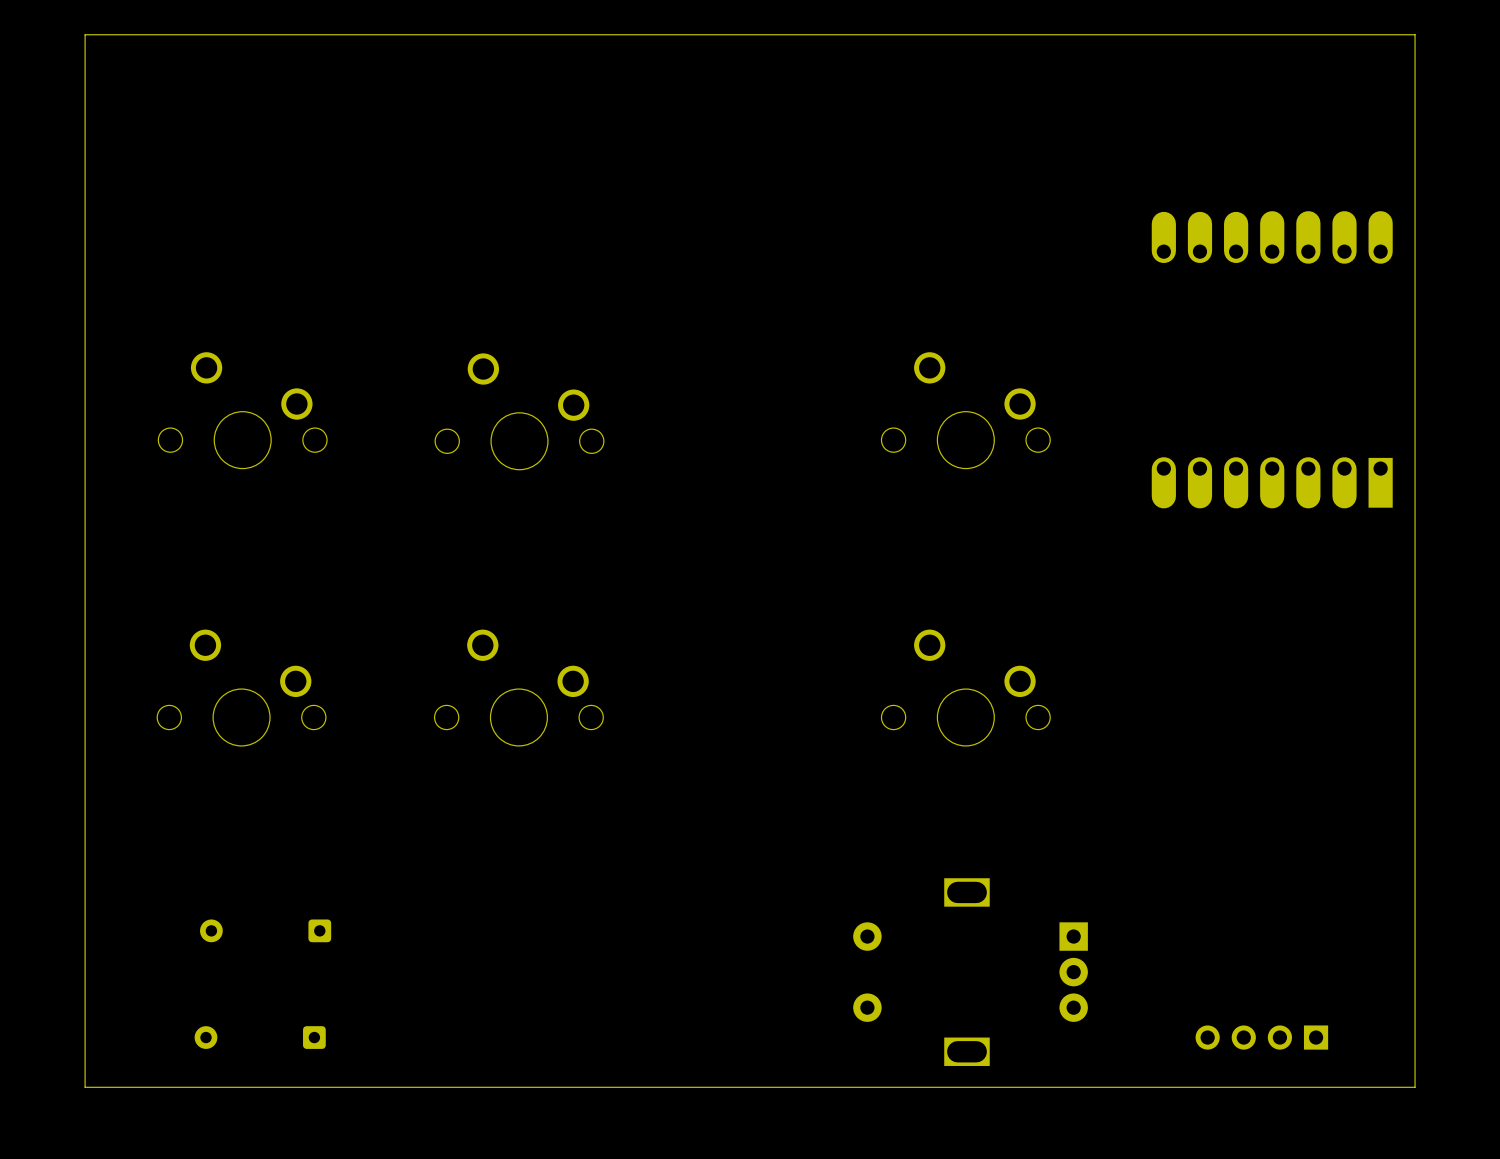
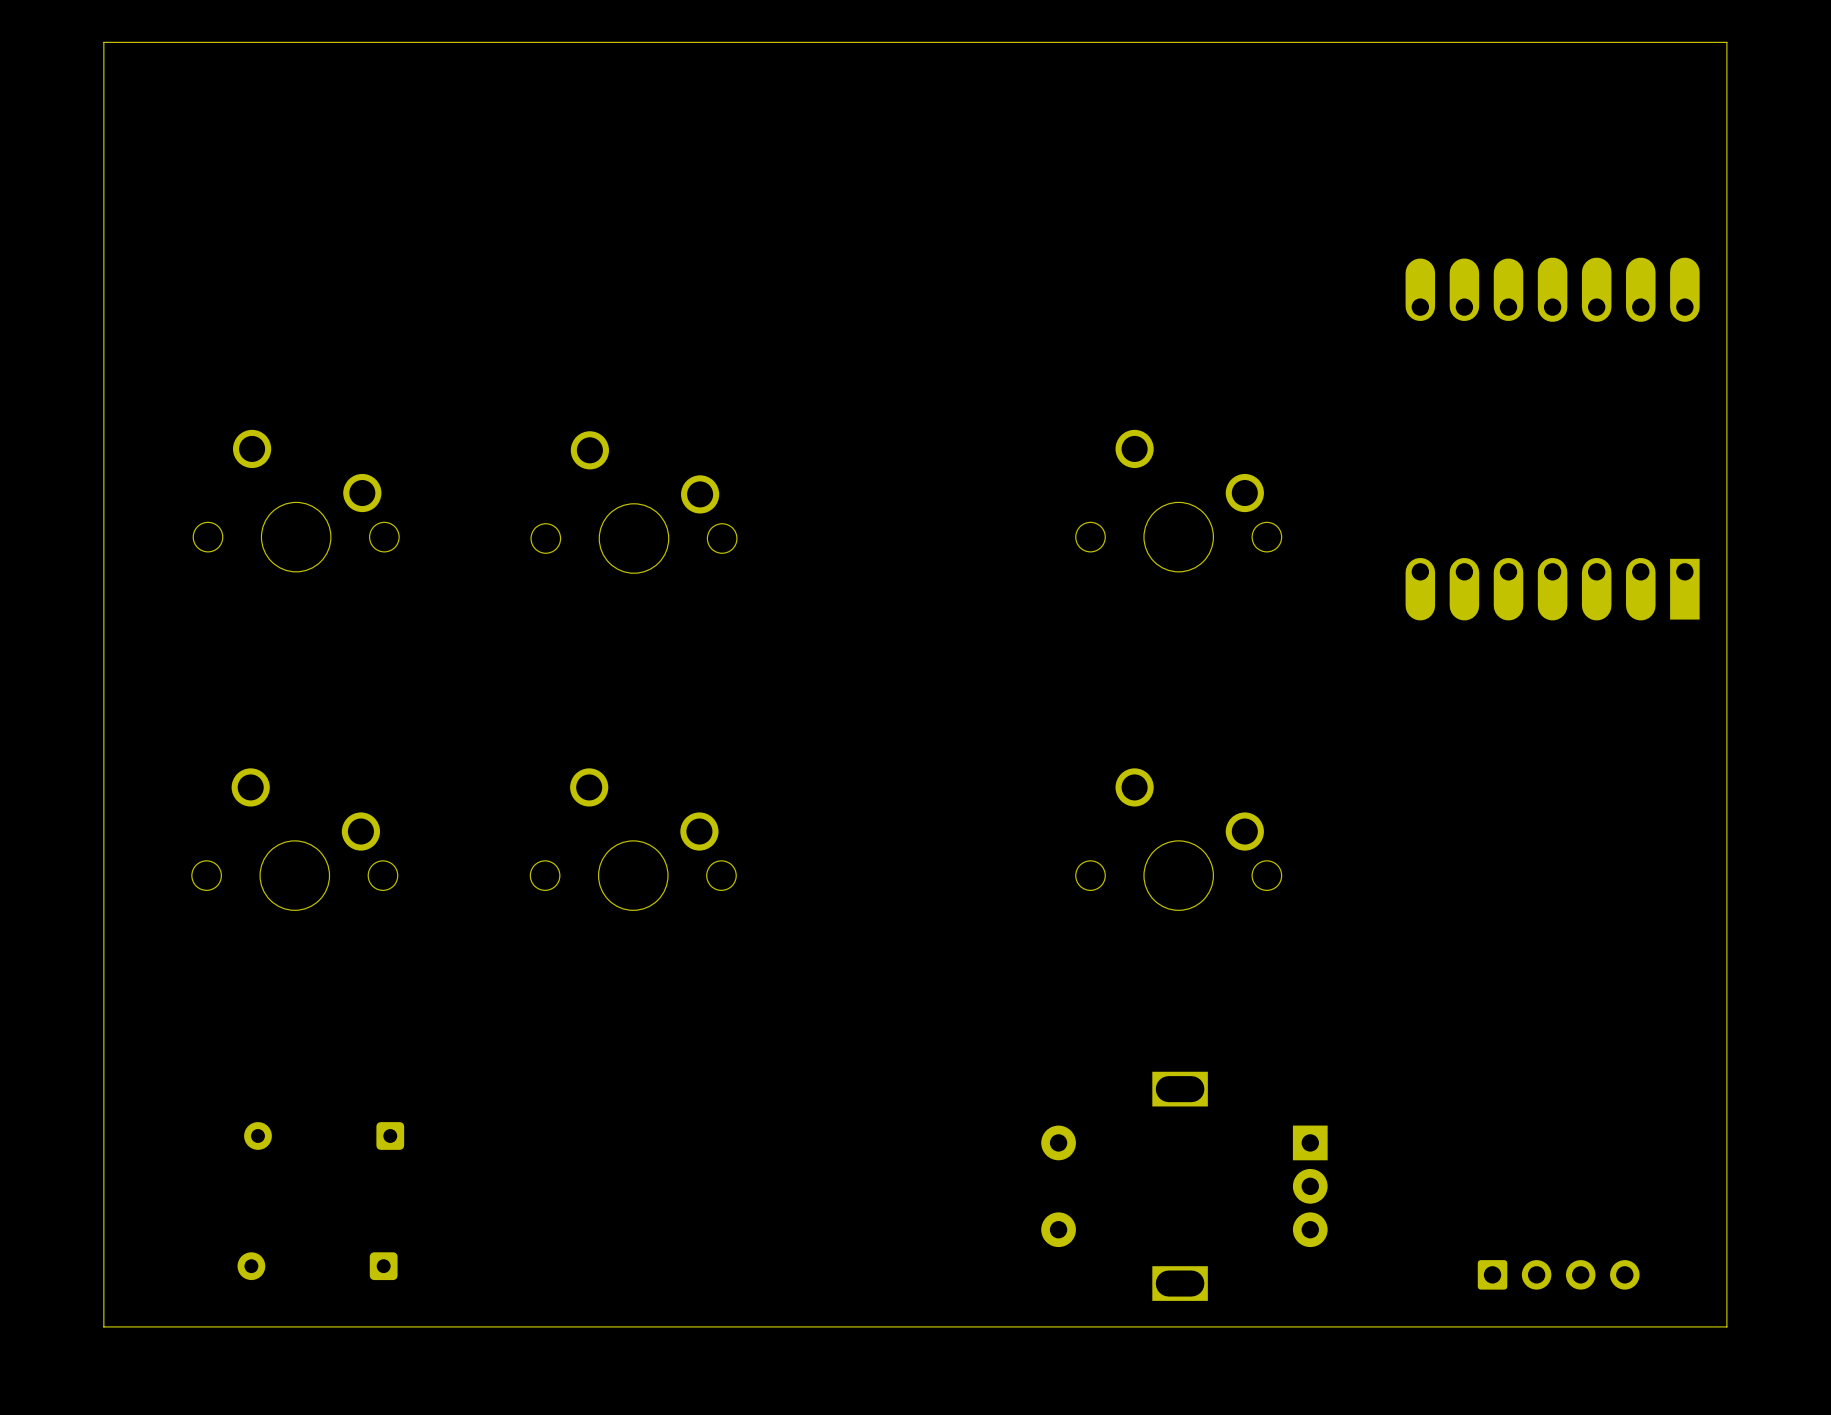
part: (1261, 1037) -> none
part: none -> (1558, 1274)

